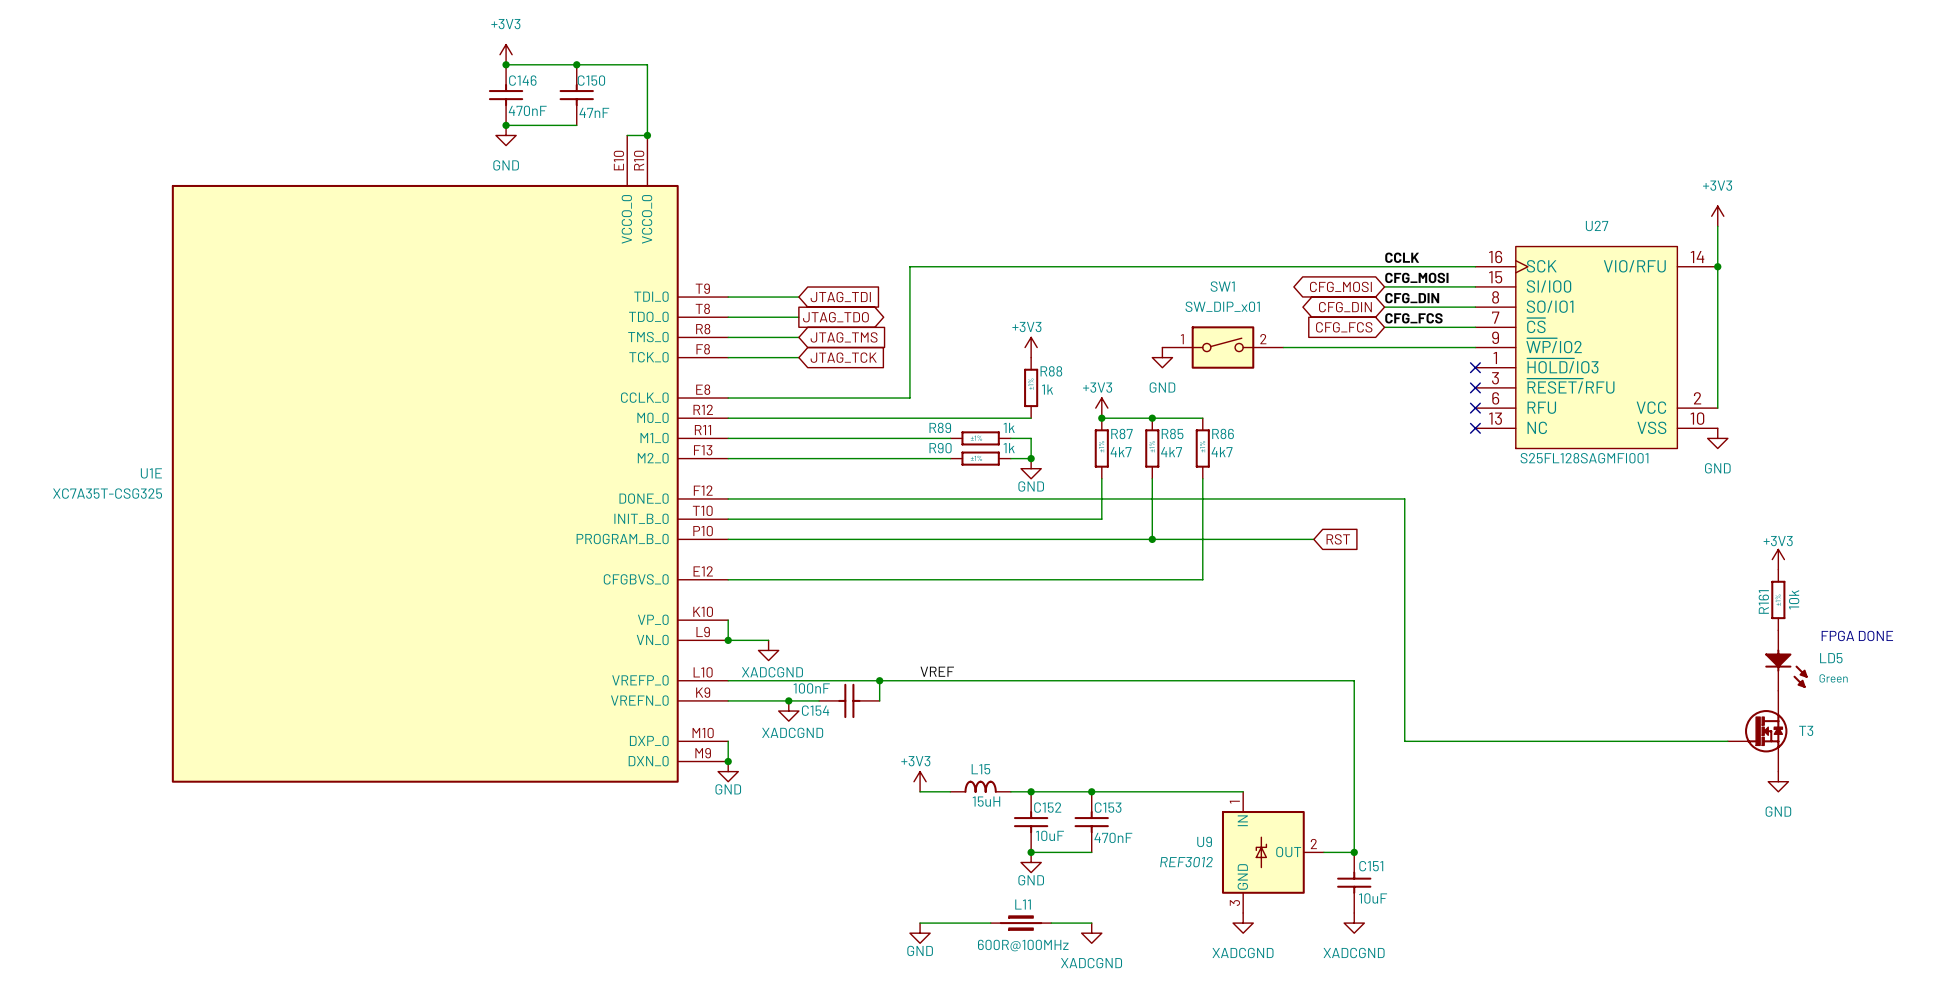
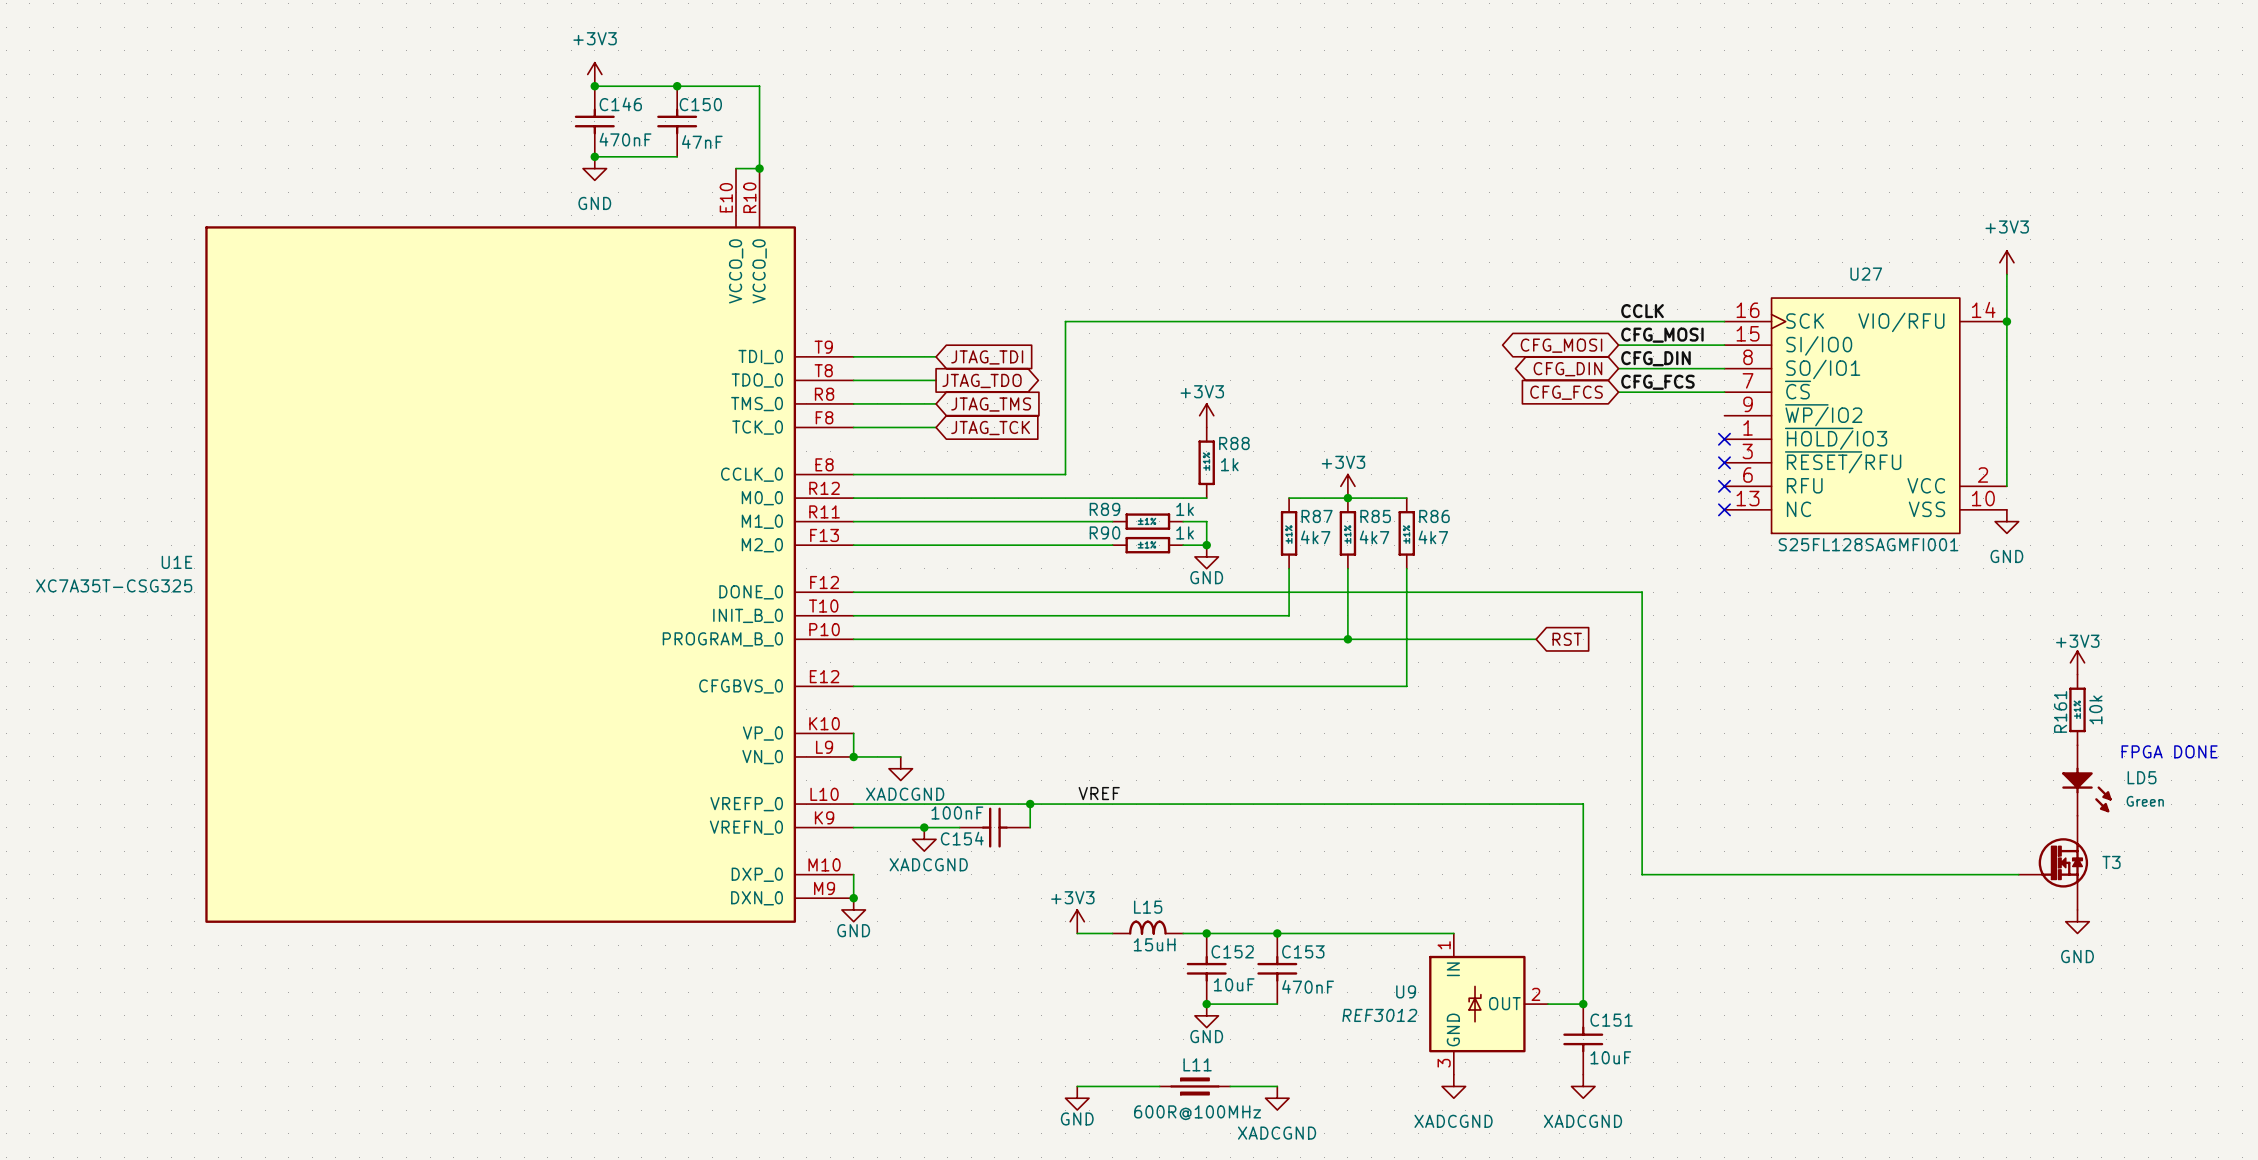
SW1: SW_DIP_x01 (1222, 347) -> none
wire: (1283, 347) (1475, 347) -> none
power symbol: GND (1162, 357) -> none
power symbol position: +3V3 (1101, 408) -> +3V3 (1347, 486)
junction: (1101, 418) -> none

